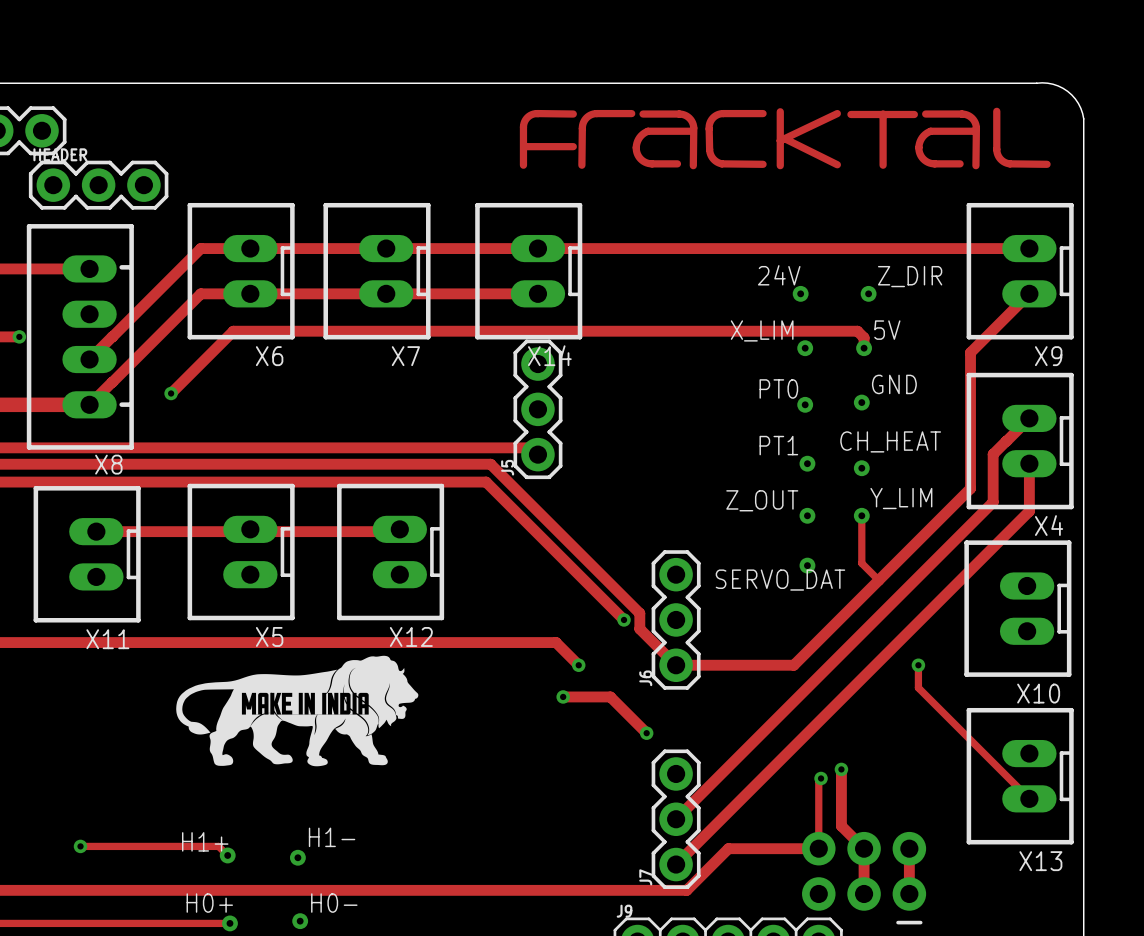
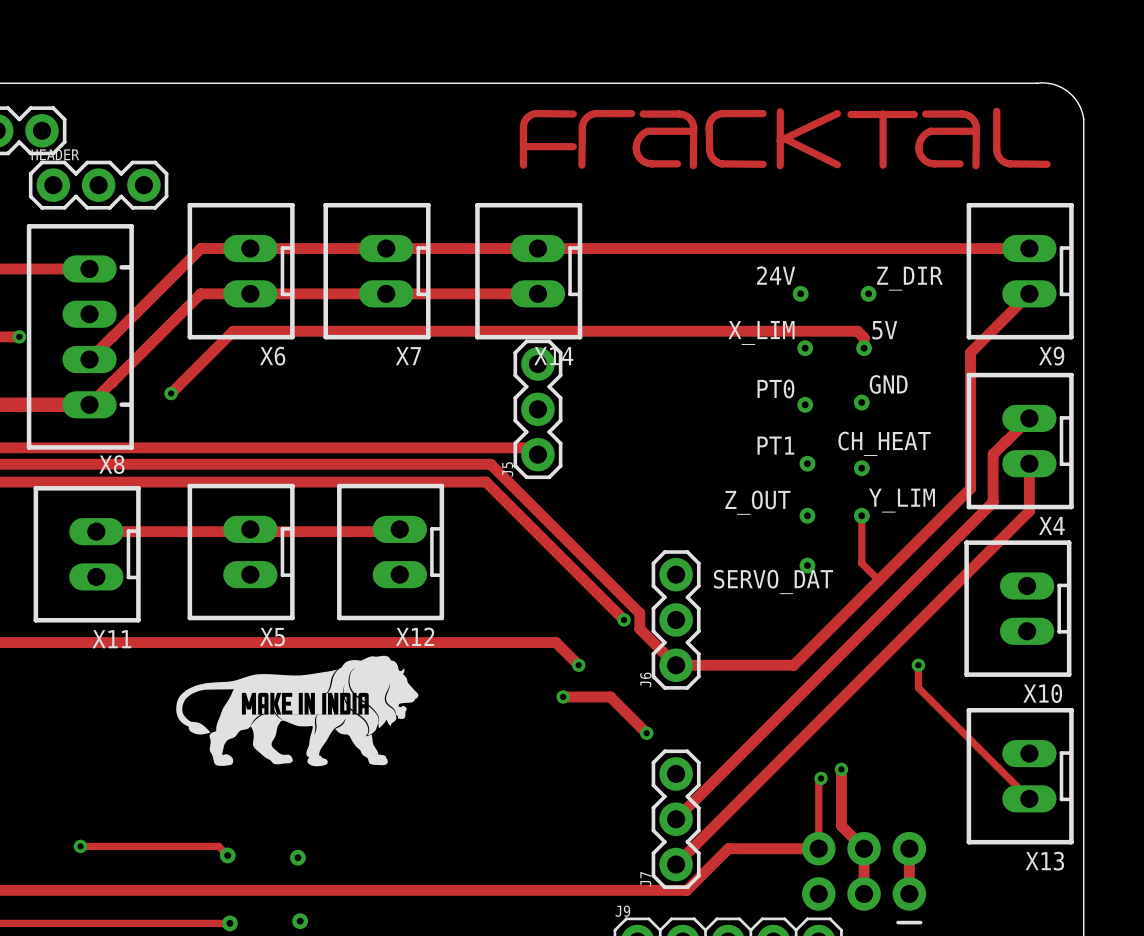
text: H1- (332, 837) -> none
text: H1+ (205, 841) -> none
text: H0+ (209, 903) -> none
text: H0- (334, 903) -> none

